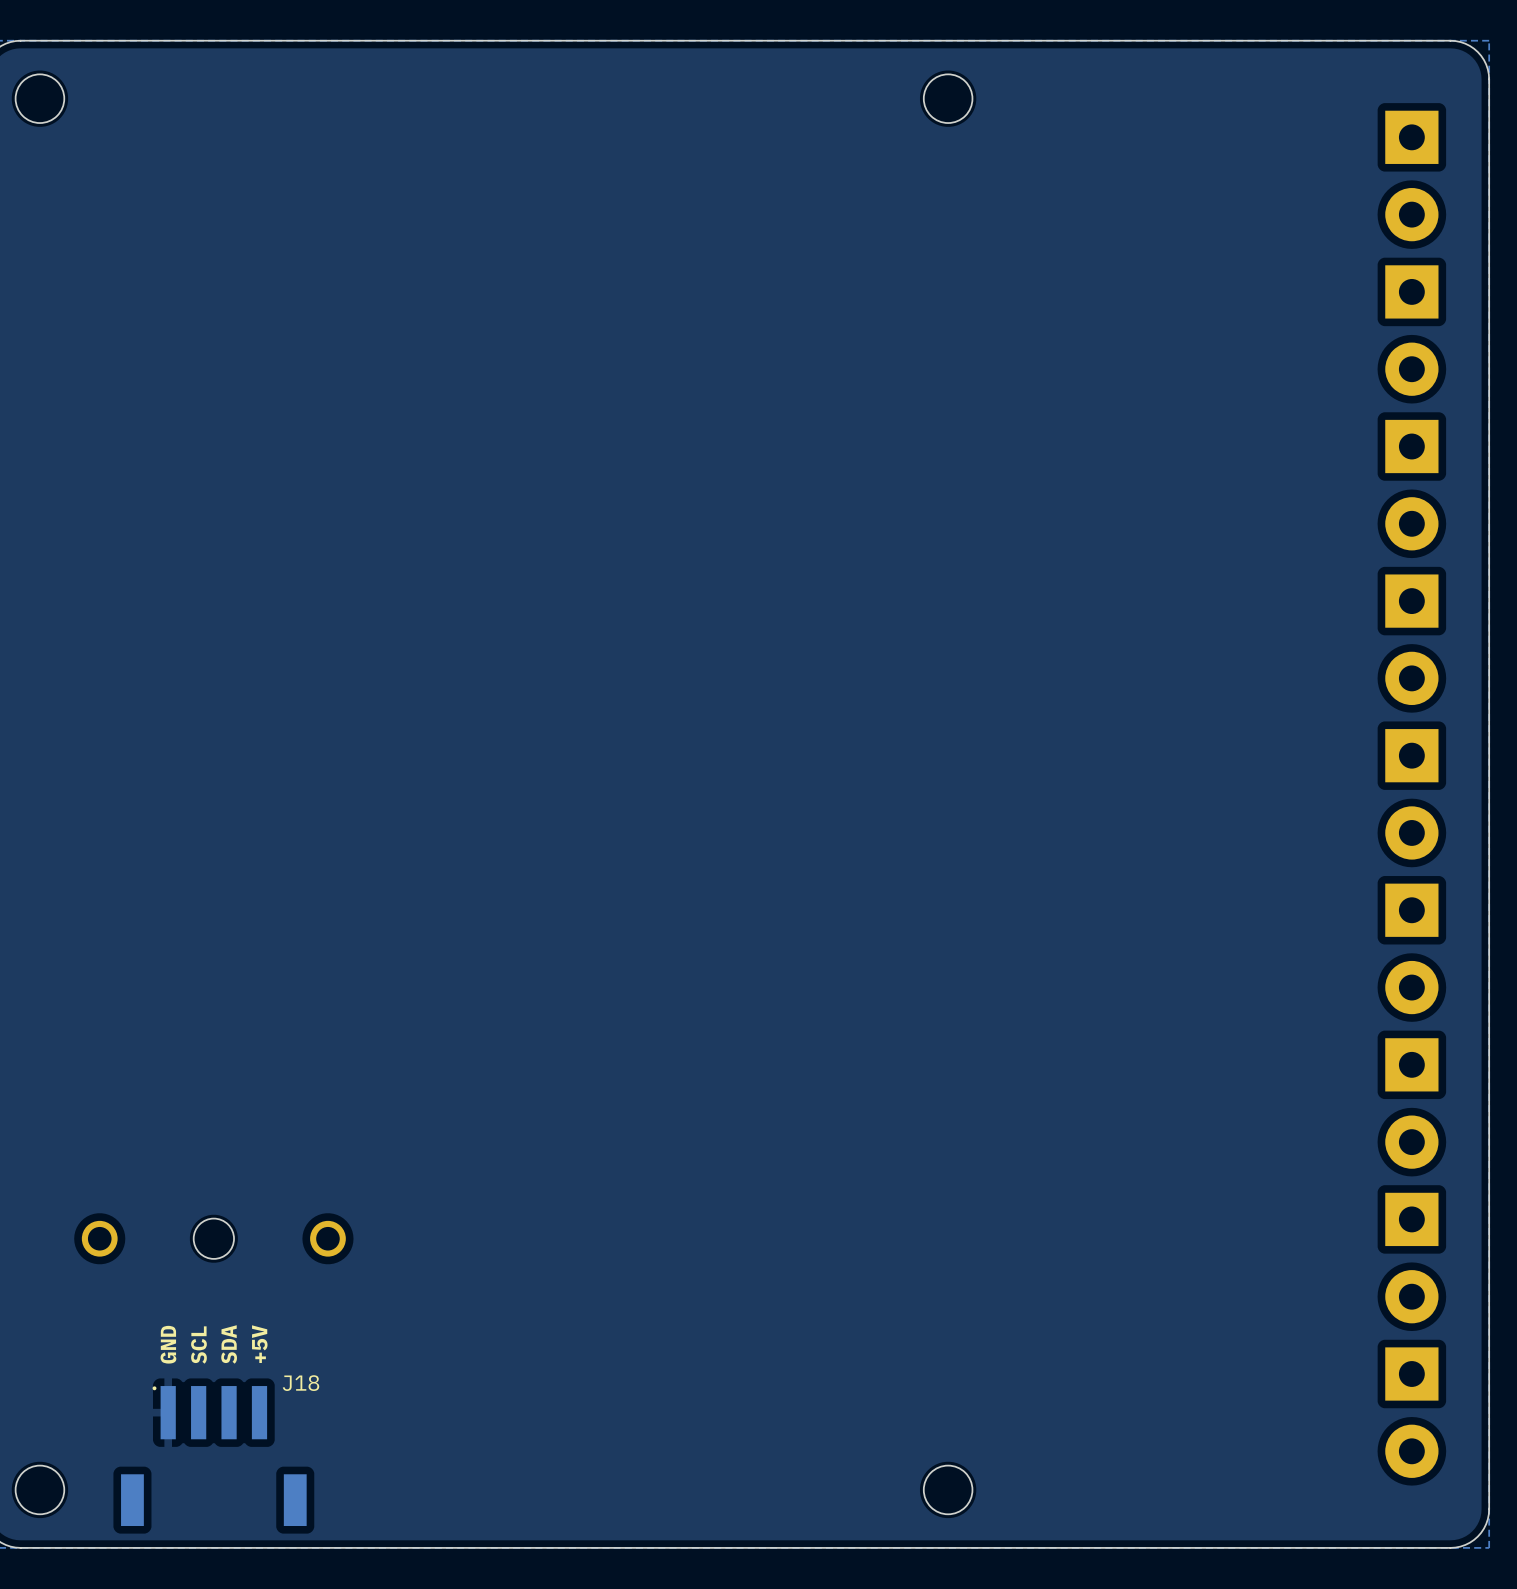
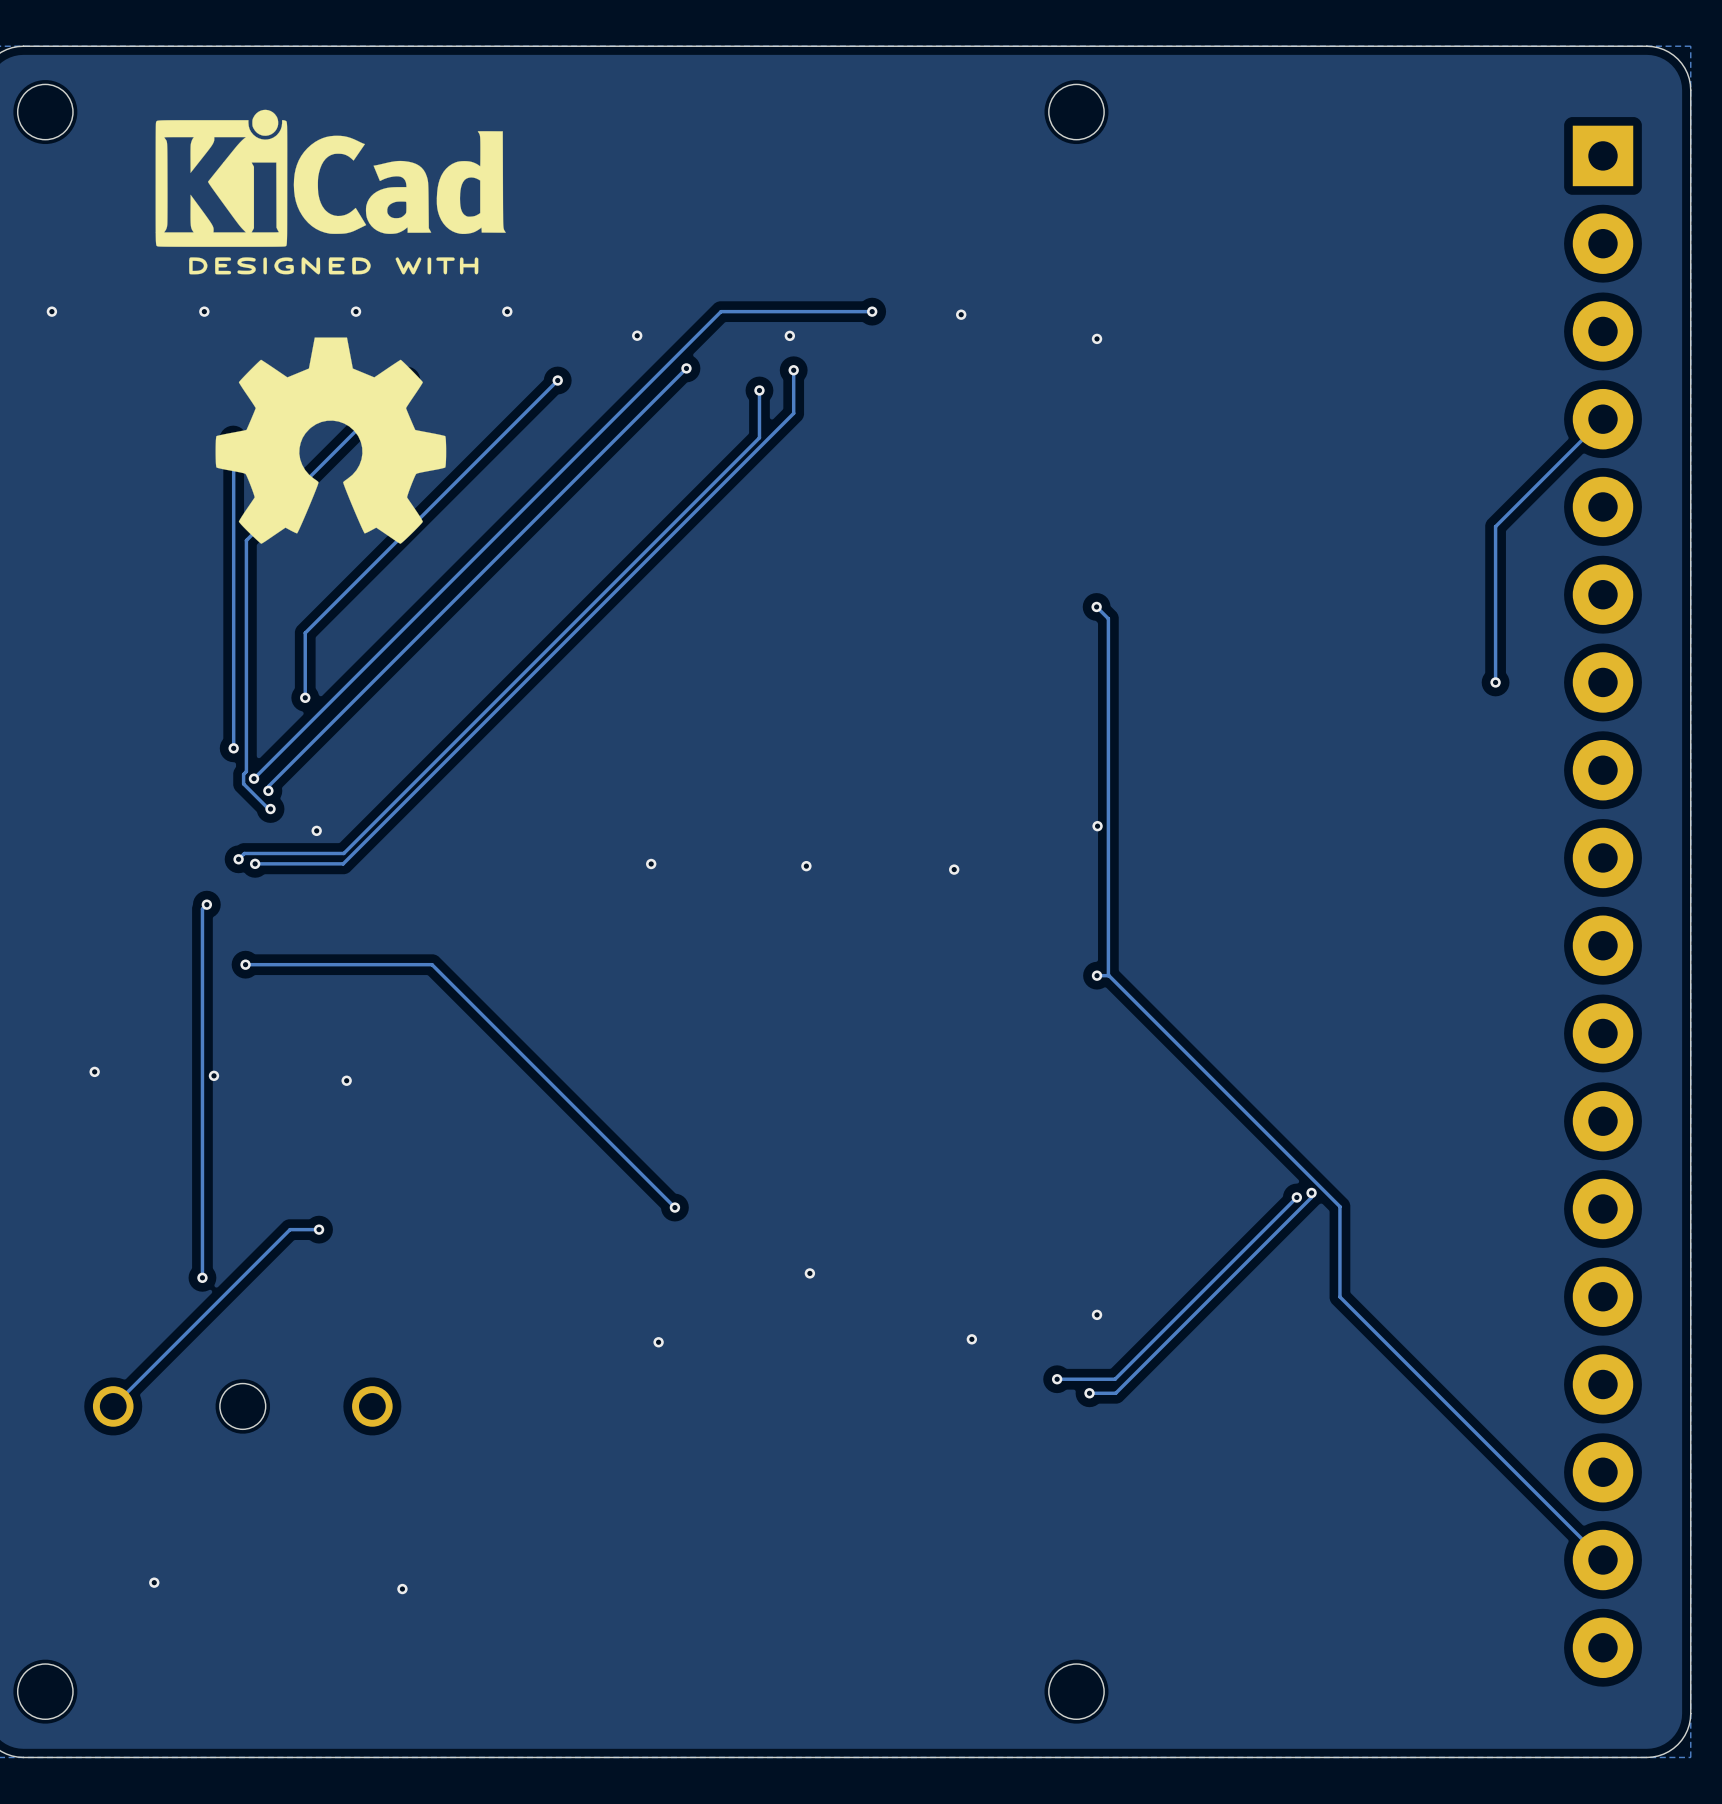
drawing: none -> [155, 109, 506, 275]
via: none -> (51, 311)
via: none -> (204, 311)
via: none -> (356, 311)
via: none -> (507, 311)
track: none -> (872, 311) (721, 311) (253, 778)
via: none -> (872, 311)
via: none -> (961, 314)
via: none -> (637, 335)
via: none -> (789, 335)
drawing: none -> [215, 337, 447, 544]
via: none -> (1097, 338)
track: none -> (686, 368) (268, 786) (268, 790)
via: none -> (686, 368)
track: none -> (793, 370) (793, 413) (343, 863) (255, 863)
via: none -> (793, 370)
part: (1411, 330) -> none
track: none -> (406, 380) (246, 540) (246, 771) (243, 774) (243, 783) (270, 809)
track: none -> (557, 380) (305, 632) (305, 697)
via: none -> (557, 380)
track: none -> (759, 390) (759, 437) (343, 853) (244, 853) (238, 859)
via: none -> (759, 390)
track: none -> (1603, 419) (1495, 526) (1495, 682)
track: none -> (233, 439) (233, 748)
part: (1411, 485) -> none
track: none -> (1096, 606) (1108, 618) (1108, 975)
via: none -> (1096, 606)
via: none -> (1495, 682)
via: none -> (305, 697)
part: (1411, 639) -> none
via: none -> (233, 748)
via: none -> (253, 778)
via: none -> (268, 790)
via: none -> (270, 809)
via: none -> (1097, 826)
part footprint: [1385, 729, 1439, 860] -> [1572, 125, 1634, 1678]
via: none -> (316, 830)
via: none -> (238, 859)
via: none -> (255, 863)
via: none -> (651, 863)
via: none -> (806, 866)
via: none -> (954, 869)
track: none -> (206, 904) (202, 909) (202, 1277)
via: none -> (206, 904)
track: none -> (245, 964) (432, 964) (674, 1207)
via: none -> (245, 964)
track: none -> (1097, 975) (1108, 975) (1339, 1206) (1339, 1296) (1603, 1560)
via: none -> (1097, 975)
via: none -> (94, 1071)
via: none -> (213, 1075)
part: (1411, 948) -> none
via: none -> (346, 1080)
track: none -> (1311, 1192) (1311, 1197) (1115, 1393) (1089, 1393)
via: none -> (1311, 1192)
track: none -> (1296, 1197) (1115, 1379) (1057, 1379)
via: none -> (1296, 1197)
via: none -> (674, 1207)
track: none -> (319, 1229) (290, 1229) (113, 1406)
via: none -> (319, 1229)
part: (1411, 1103) -> none
via: none -> (809, 1273)
via: none -> (202, 1277)
via: none -> (1097, 1314)
via: none -> (971, 1339)
via: none -> (658, 1342)
via: none -> (1057, 1379)
via: none -> (1089, 1393)
part: (1411, 1258) -> none
text: GND (168, 1344) -> none
text: SDA (229, 1344) -> none
text: +5V (259, 1344) -> none
text: SCL (198, 1345) -> none
via: none -> (154, 1582)
via: none -> (402, 1589)
part: (1411, 1412) -> none
J18: (213, 1456) -> none

